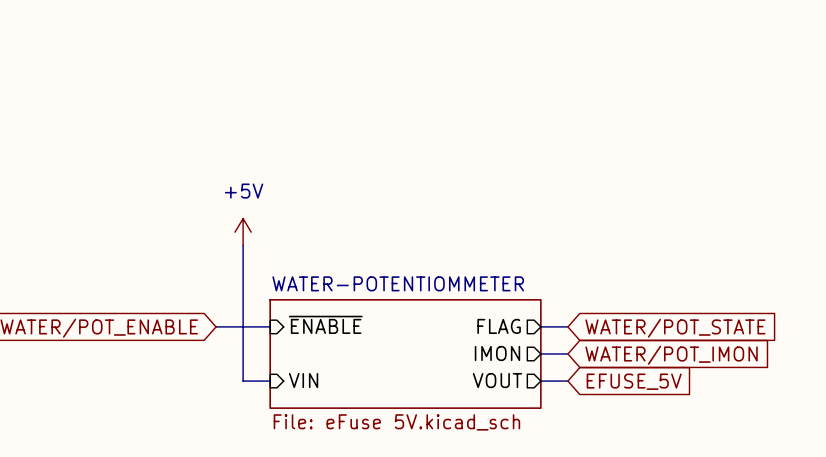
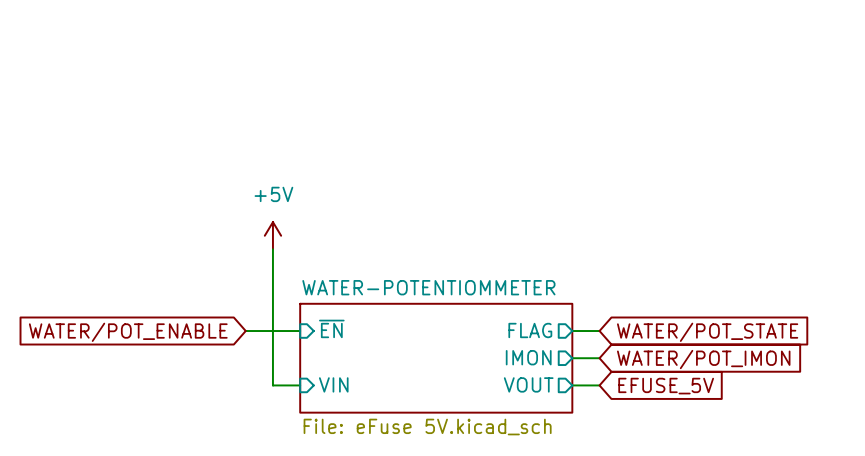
sheet pin: ~{ENABLE} (325, 324) -> ~{EN} (331, 328)

